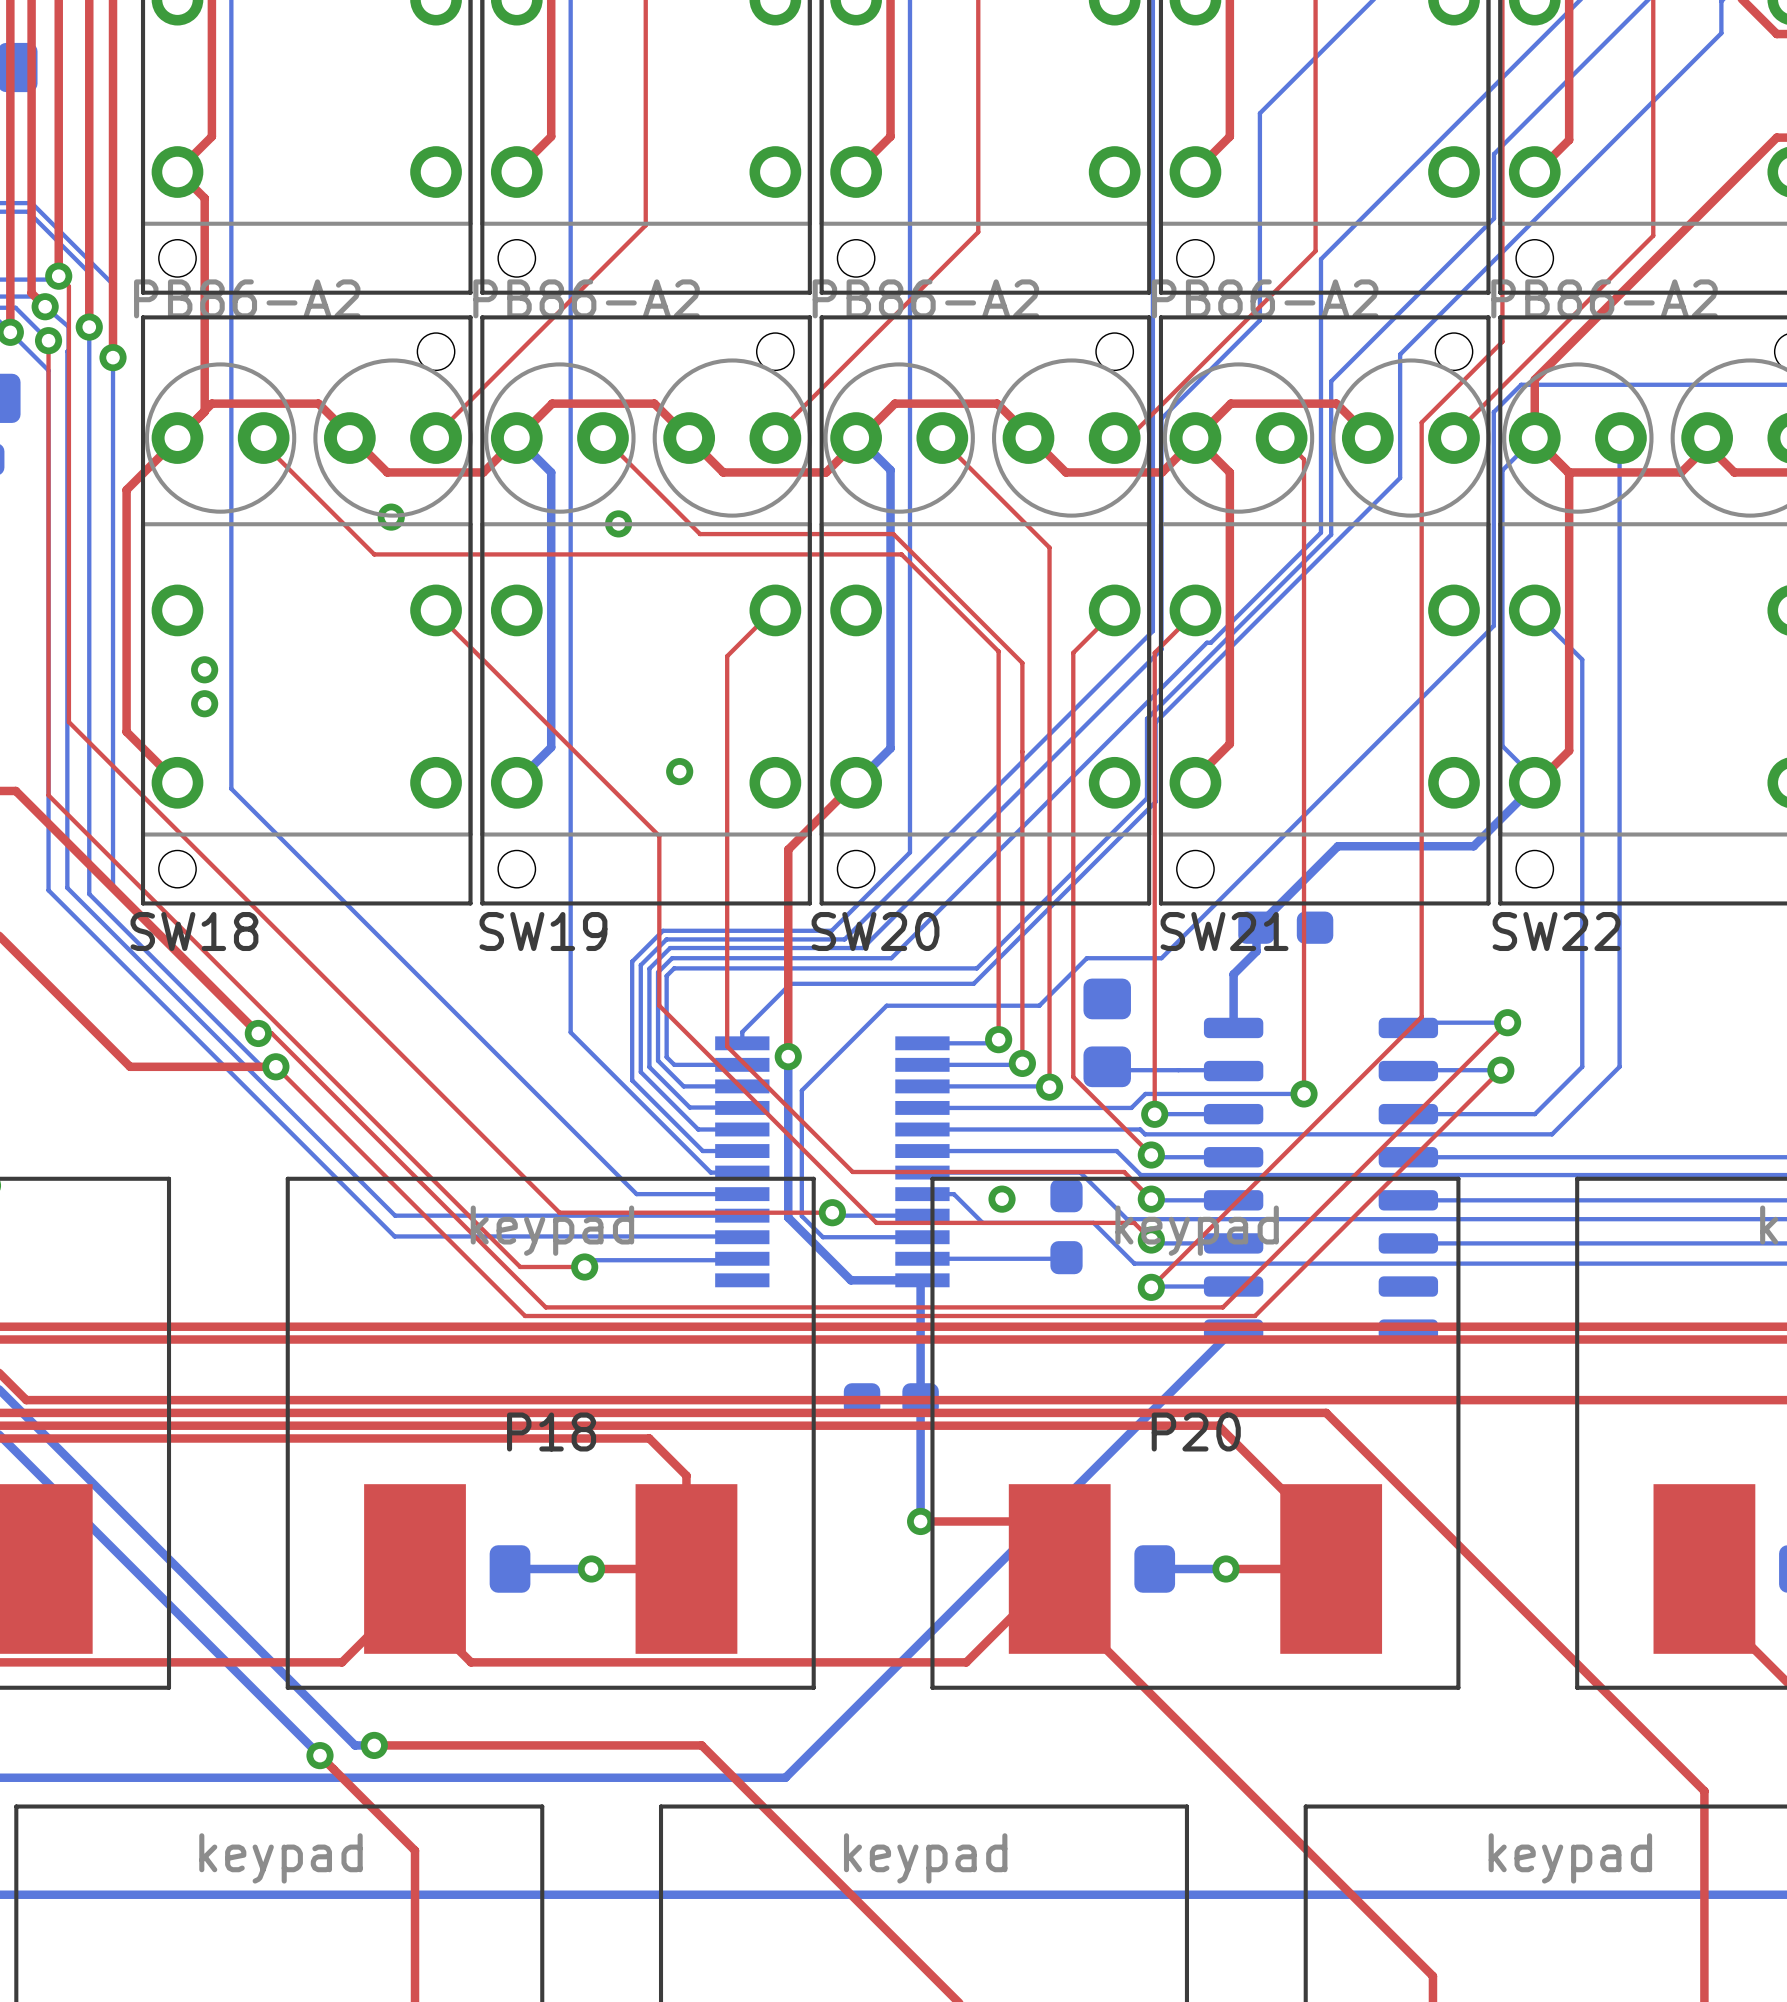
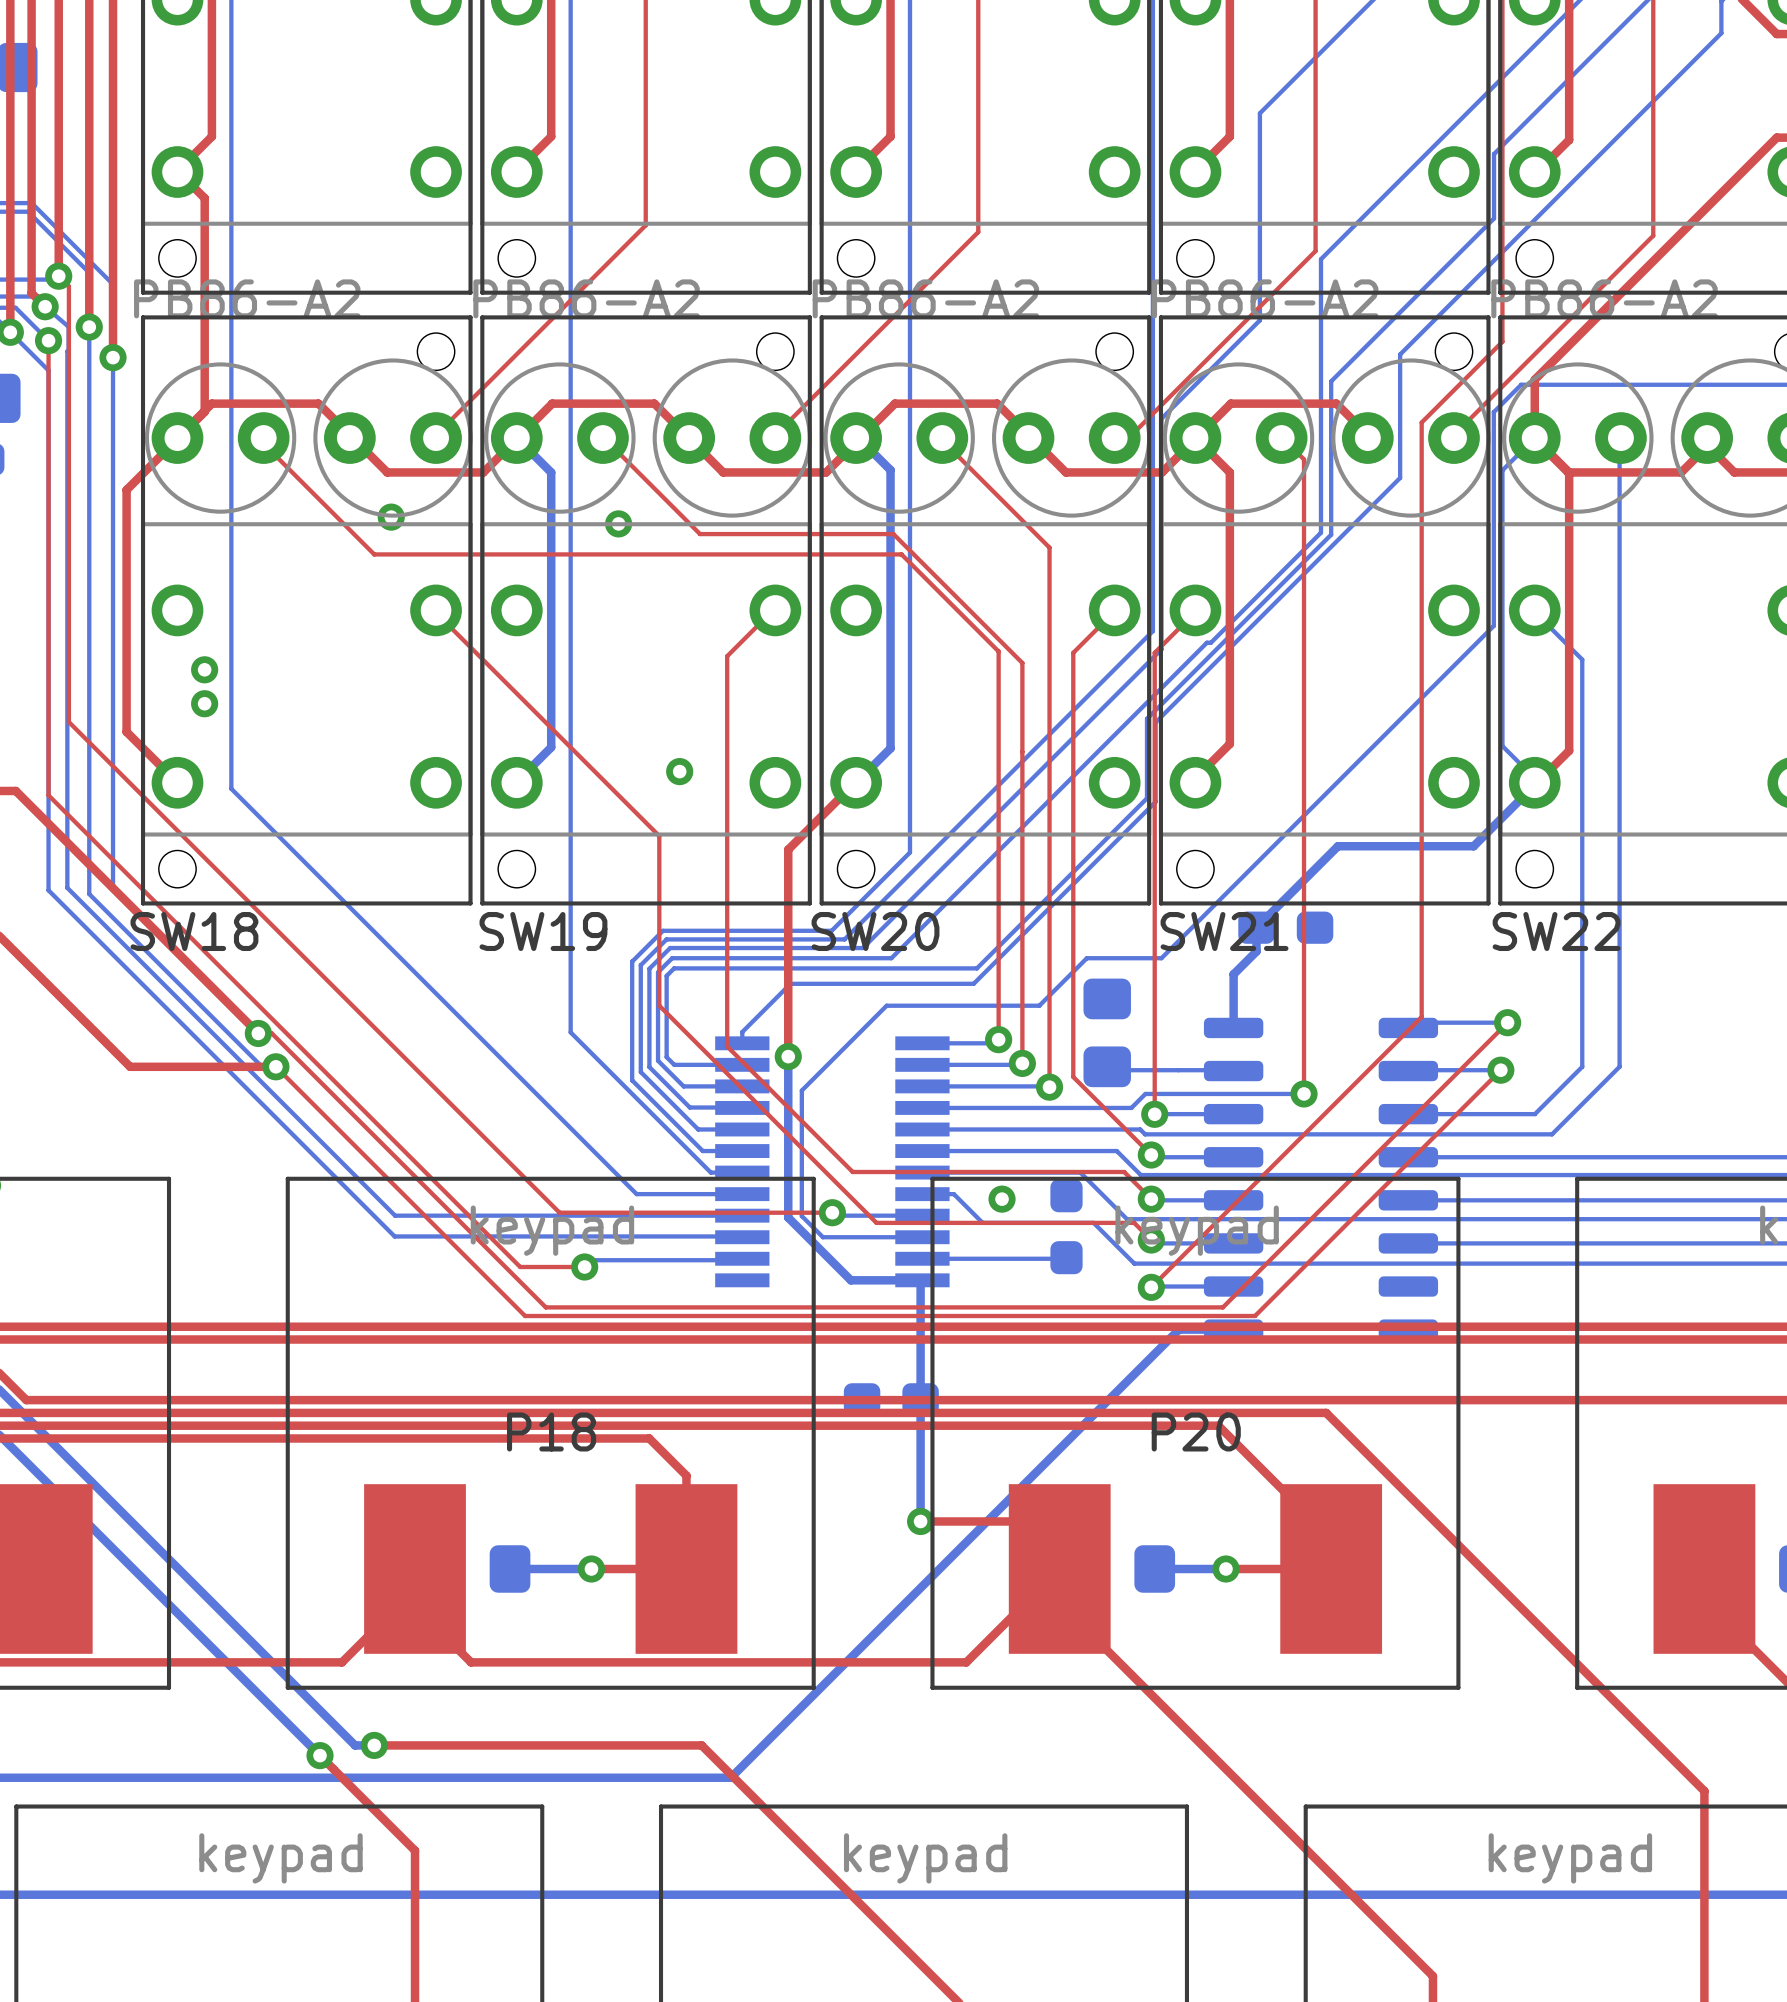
bottom track: (1233, 1329) (785, 1777) (730, 1777) -> (1233, 1329) (1178, 1329) (730, 1777)

